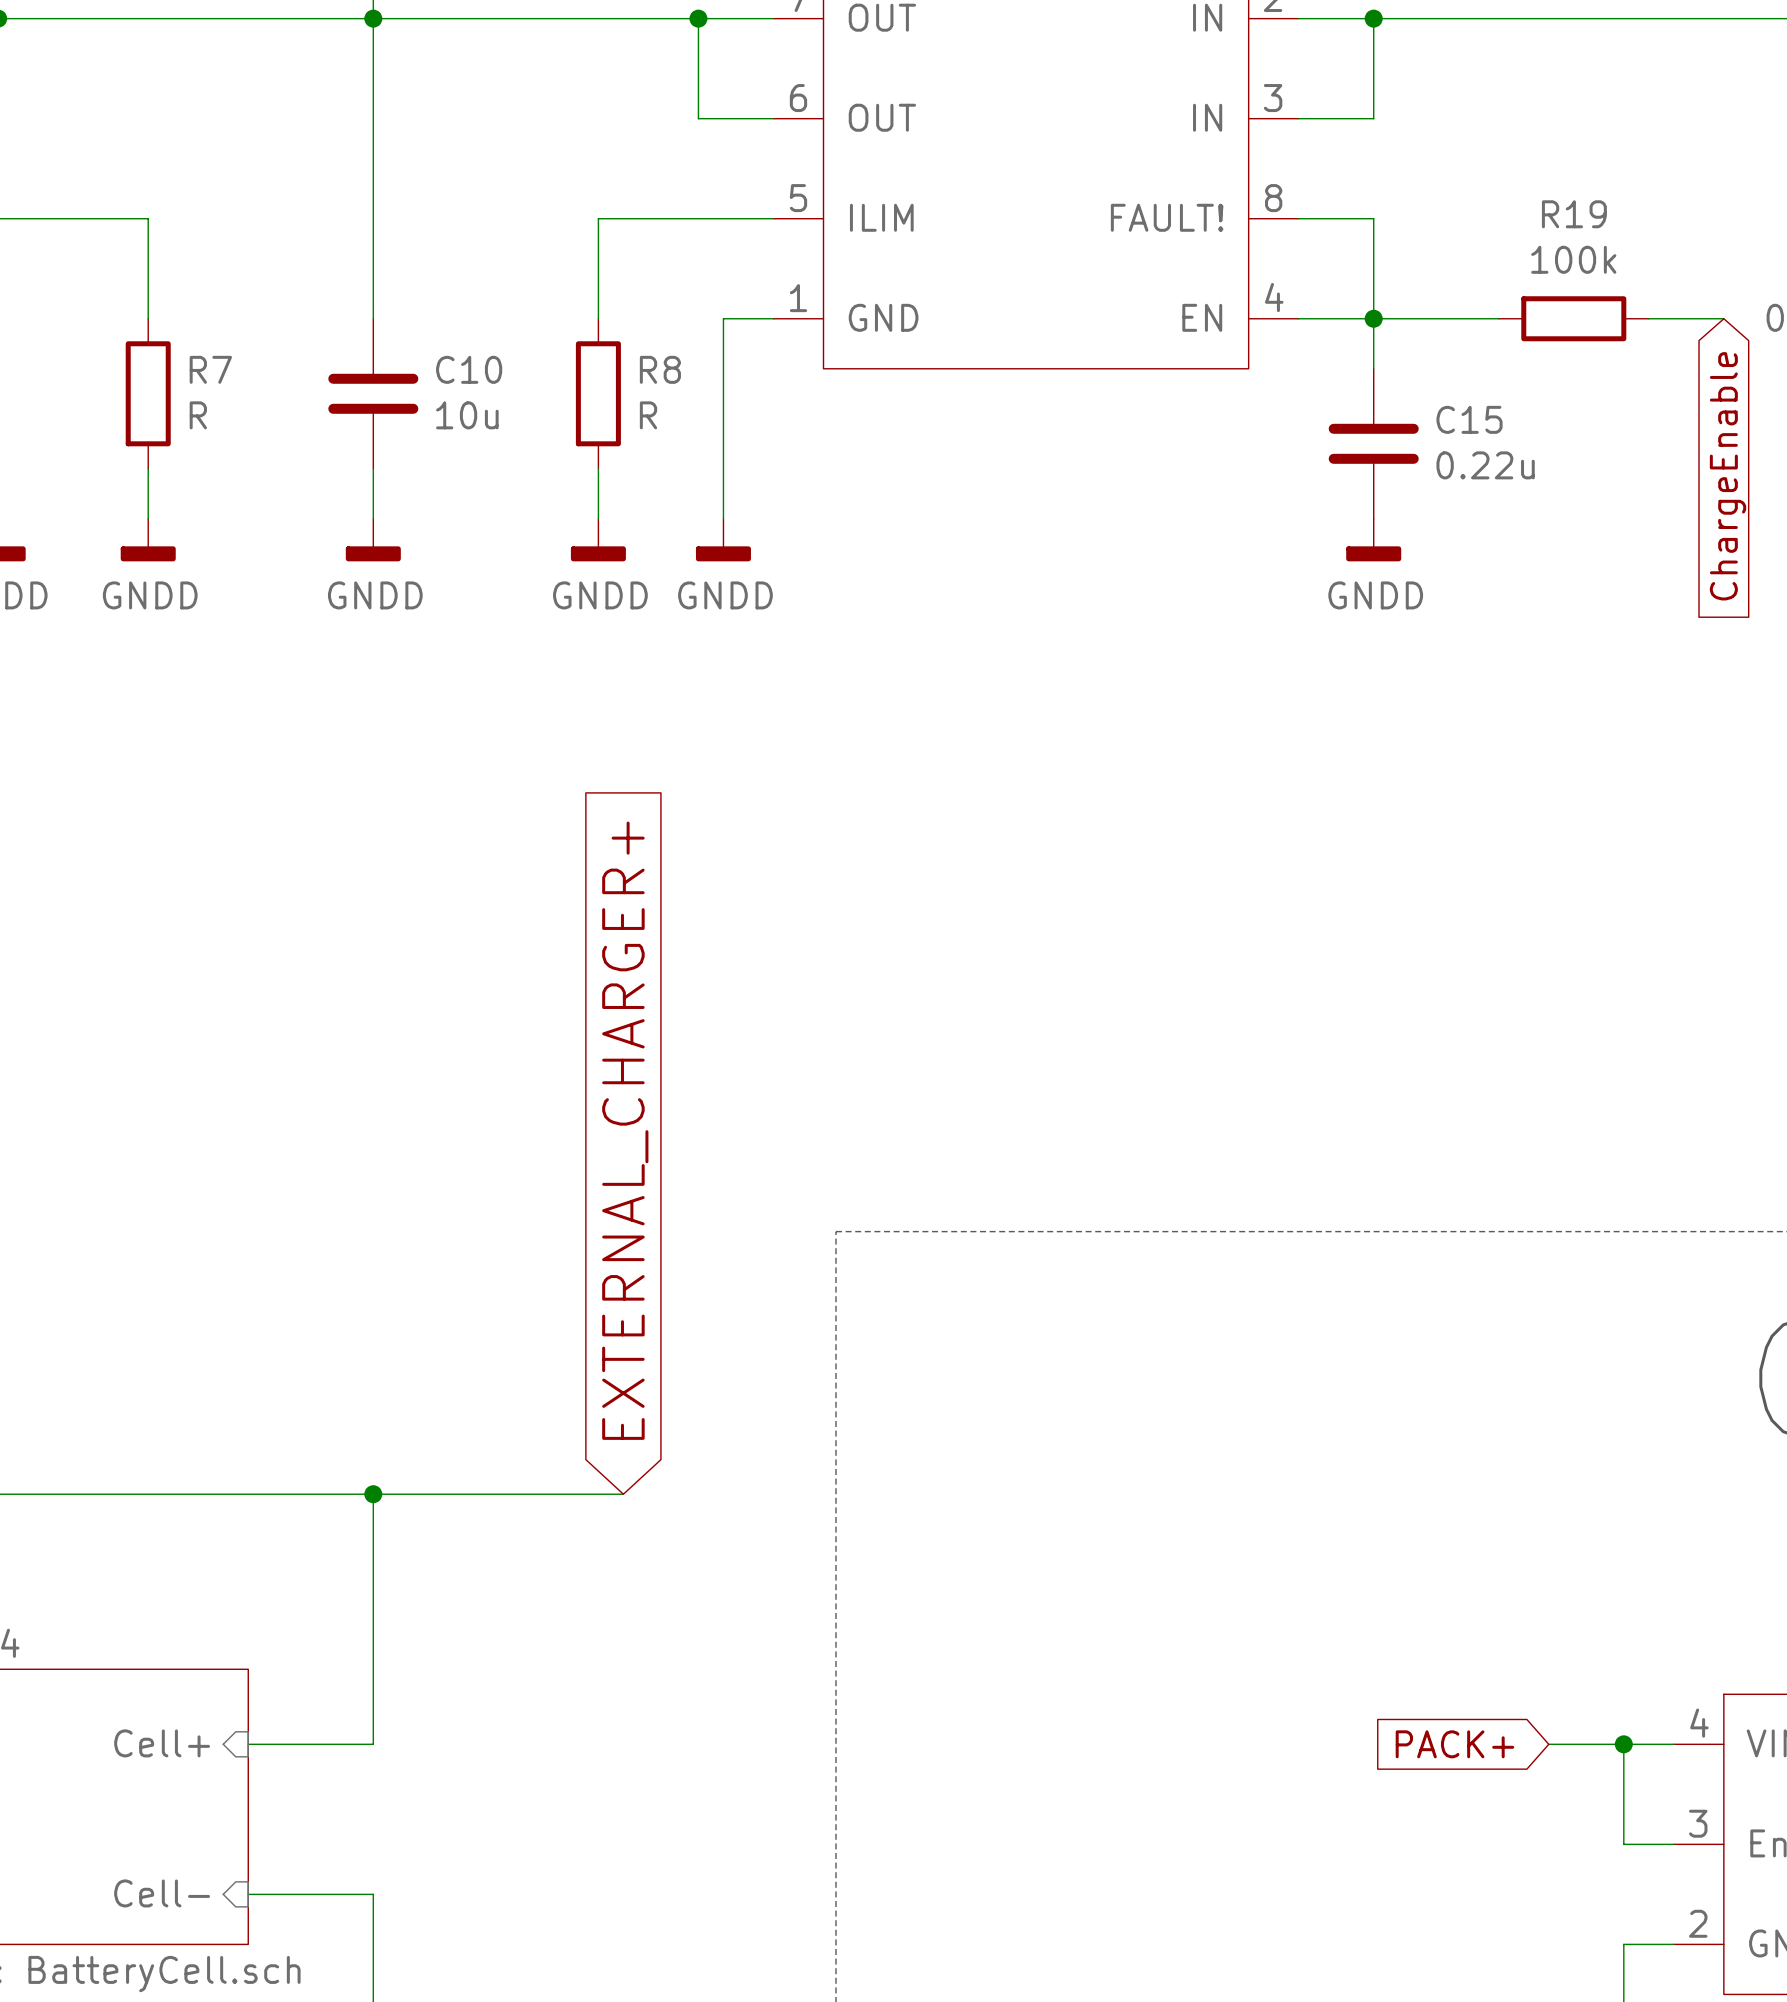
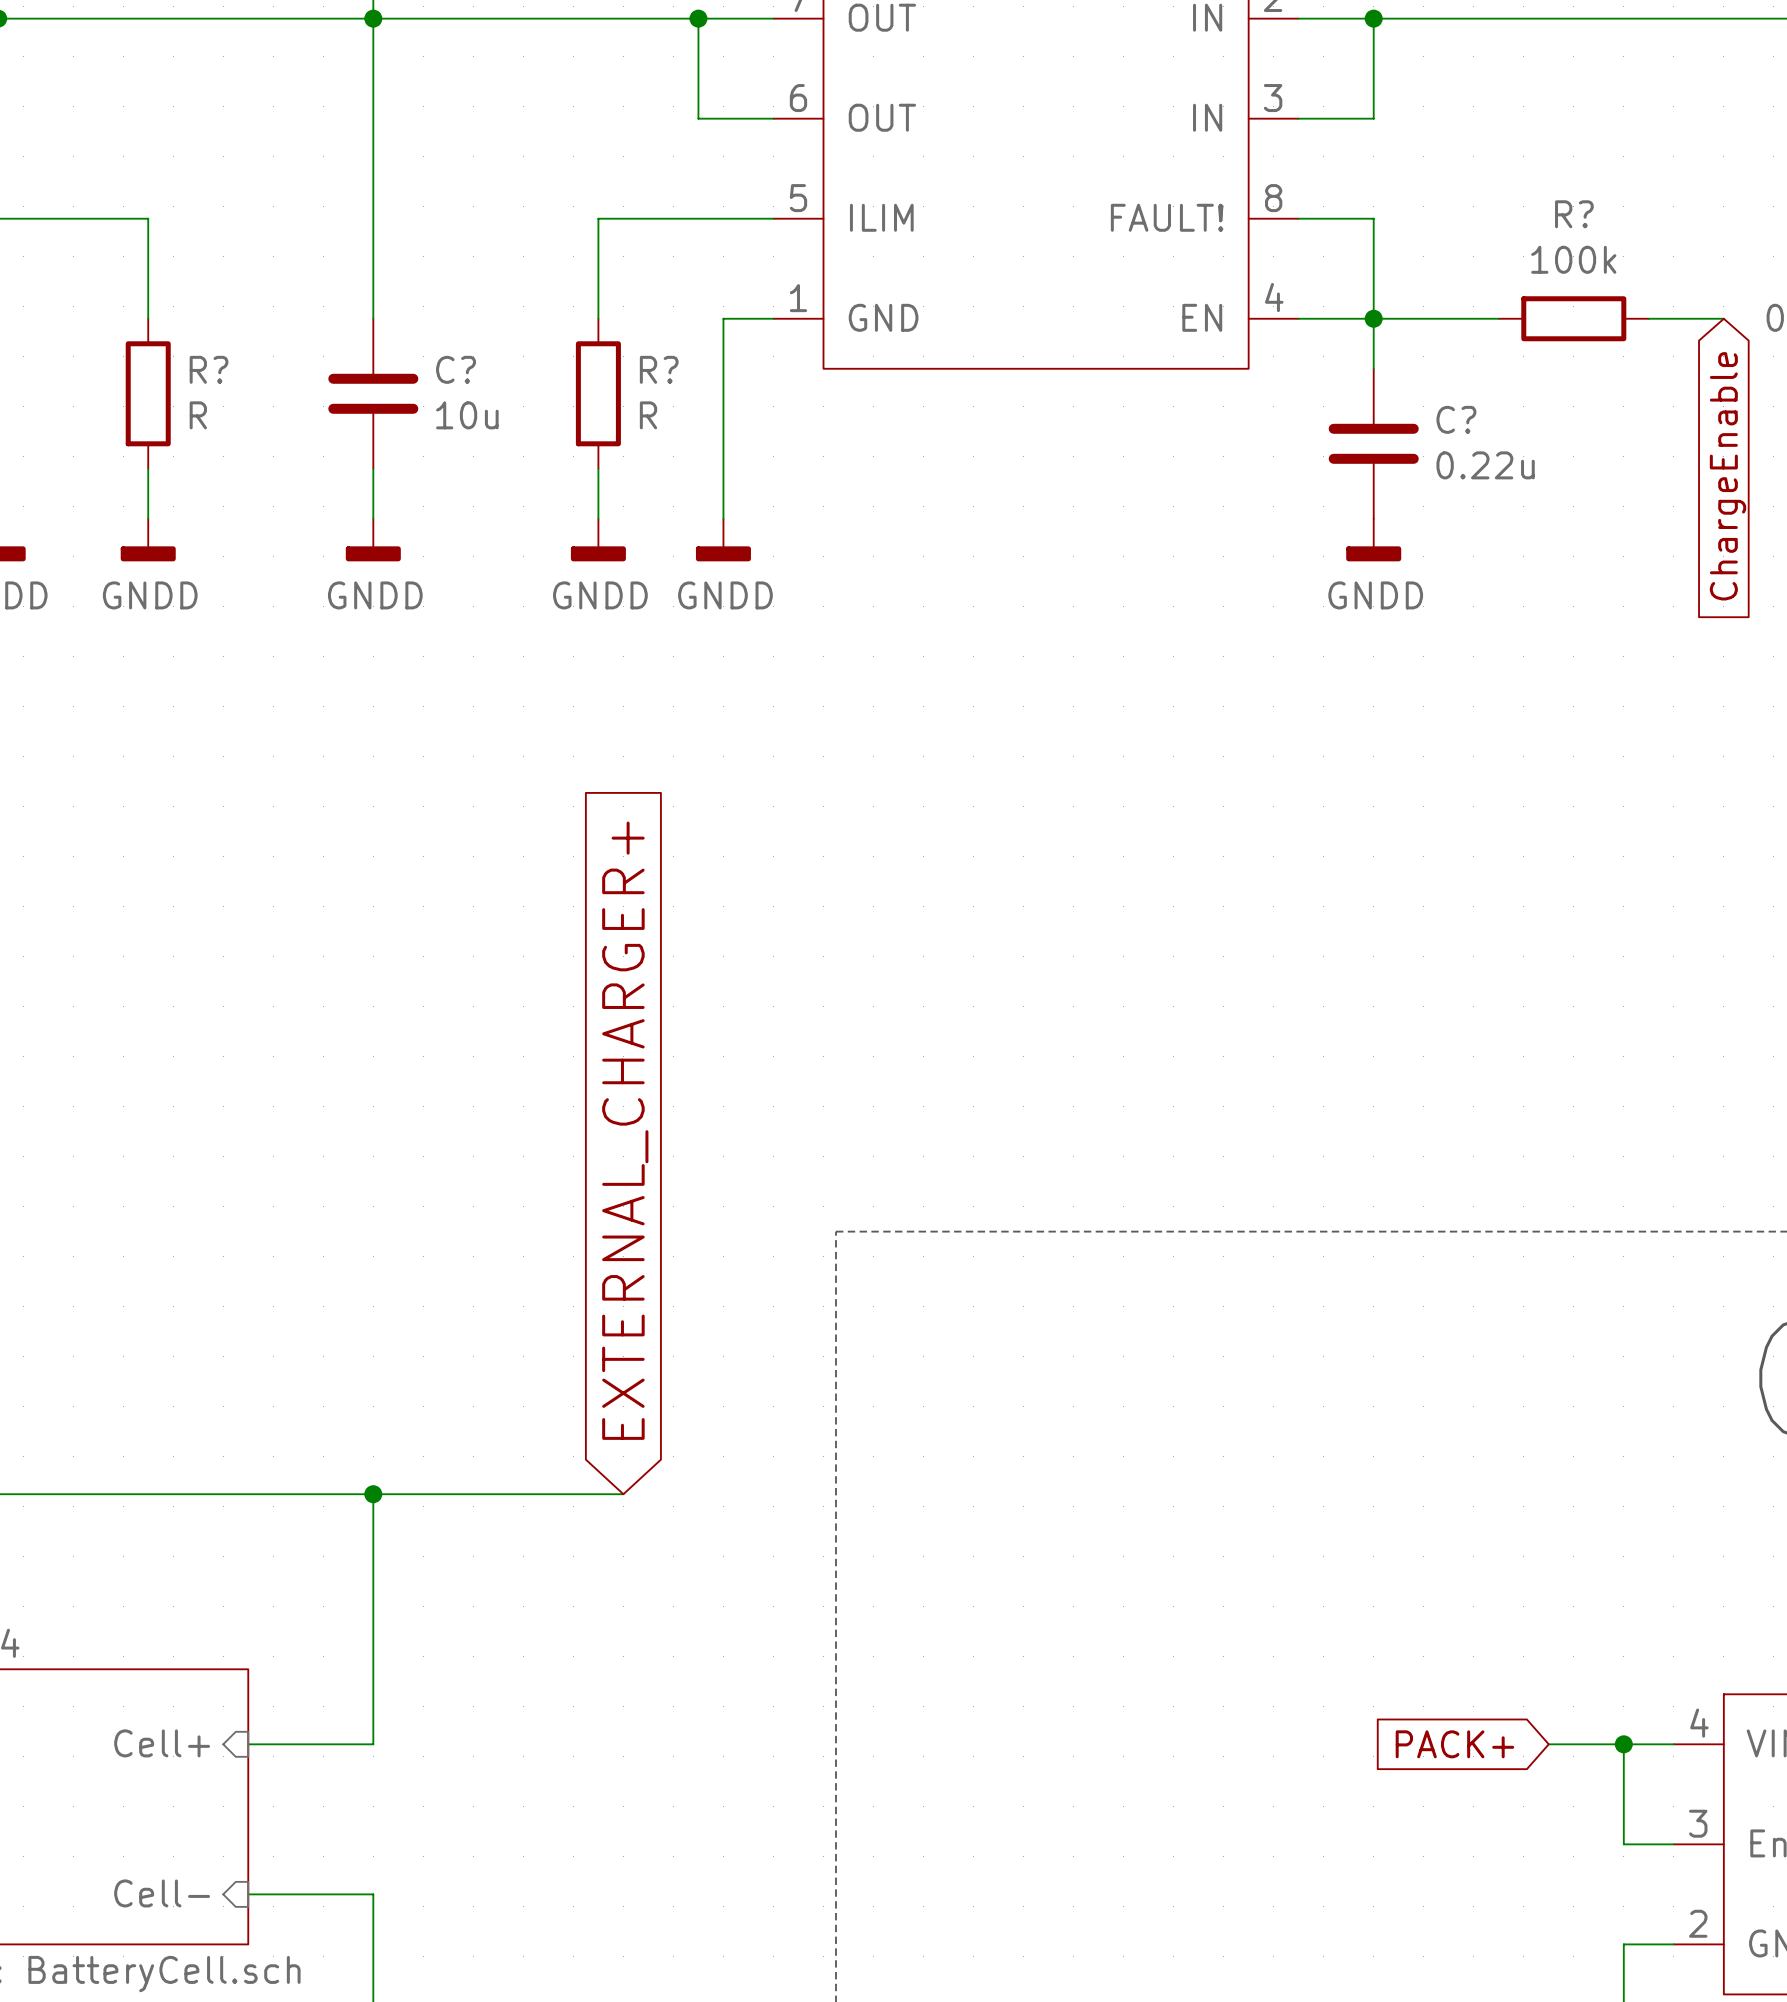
R19 name: R19 (1574, 214) -> R? (1574, 214)
R7 name: R7 (210, 369) -> R? (209, 369)
C10 name: C10 (469, 369) -> C? (456, 369)
R8 name: R8 (660, 369) -> R? (659, 369)
C15 name: C15 (1469, 419) -> C? (1456, 419)

